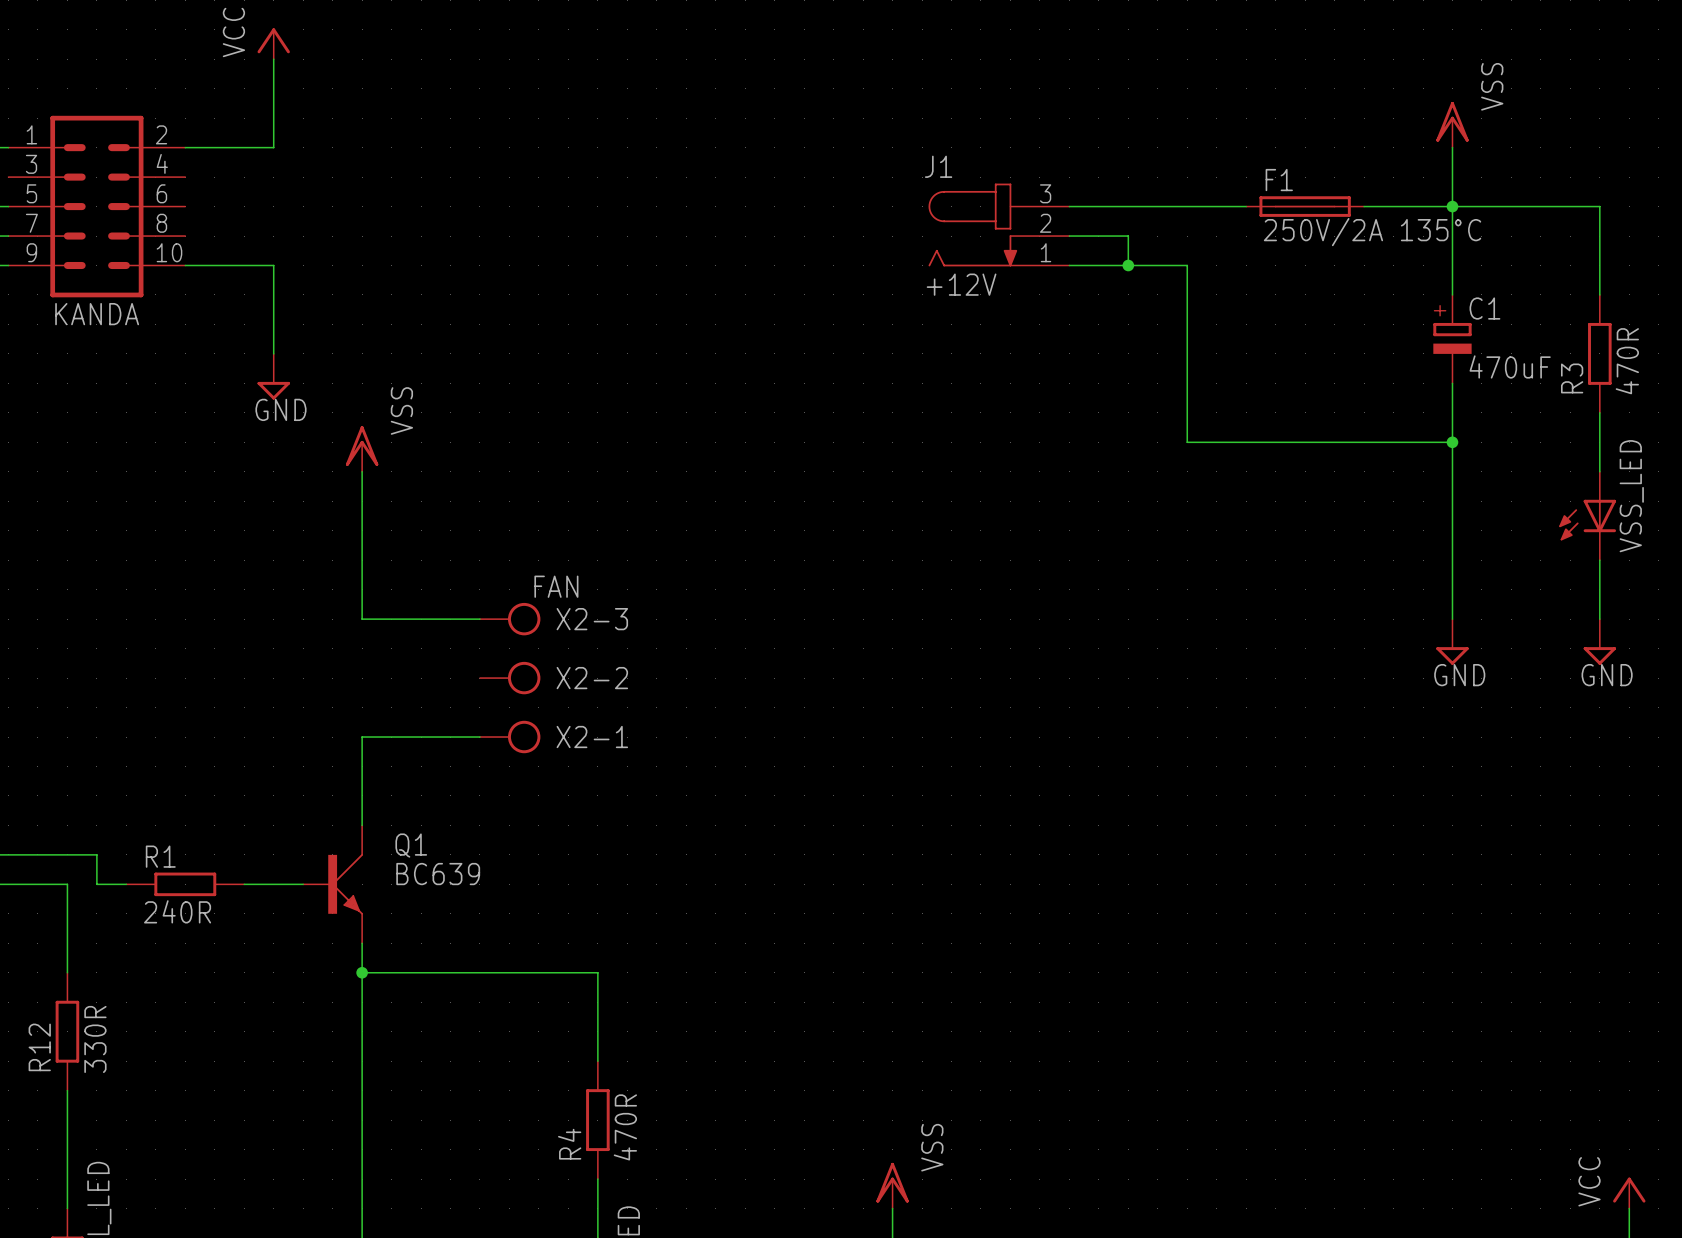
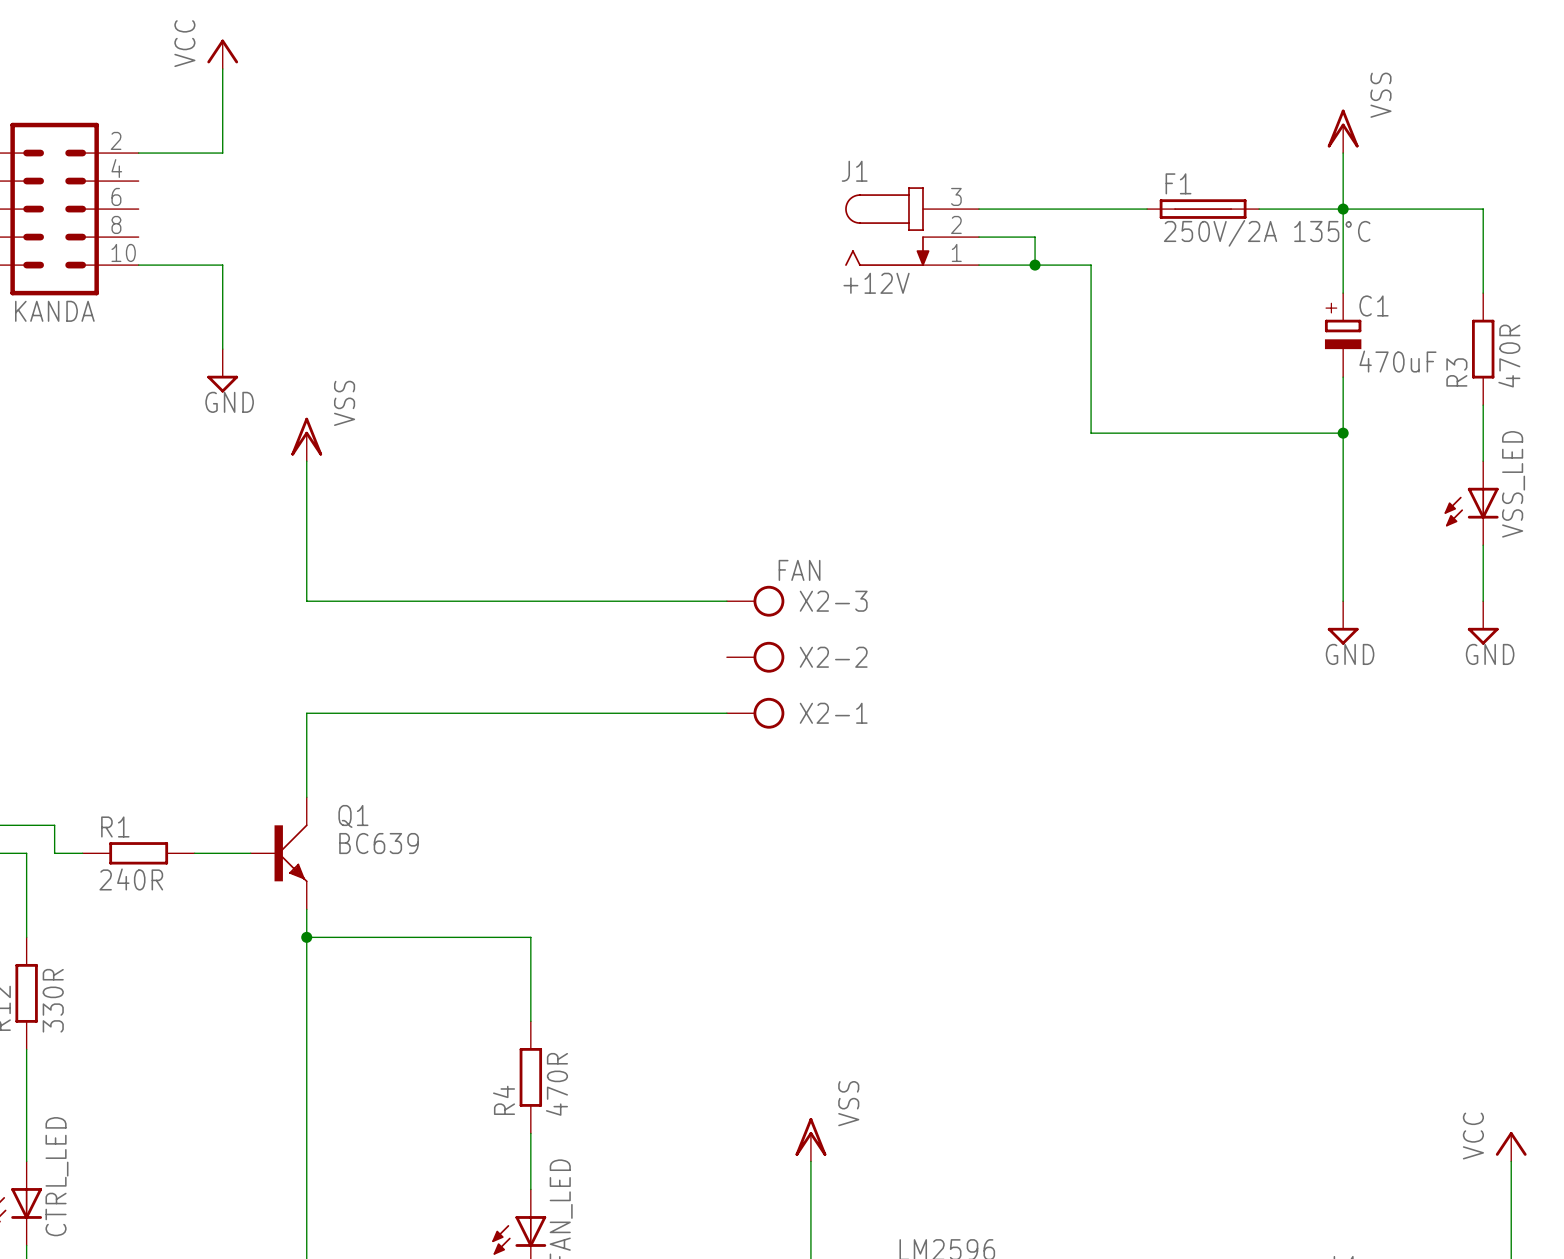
wire: none -> (418, 601) (726, 601)
X2-3 position: (510, 619) -> (755, 601)
X2-2 position: (510, 678) -> (755, 657)
wire: none -> (418, 713) (726, 713)
X2-1 position: (510, 737) -> (755, 713)

